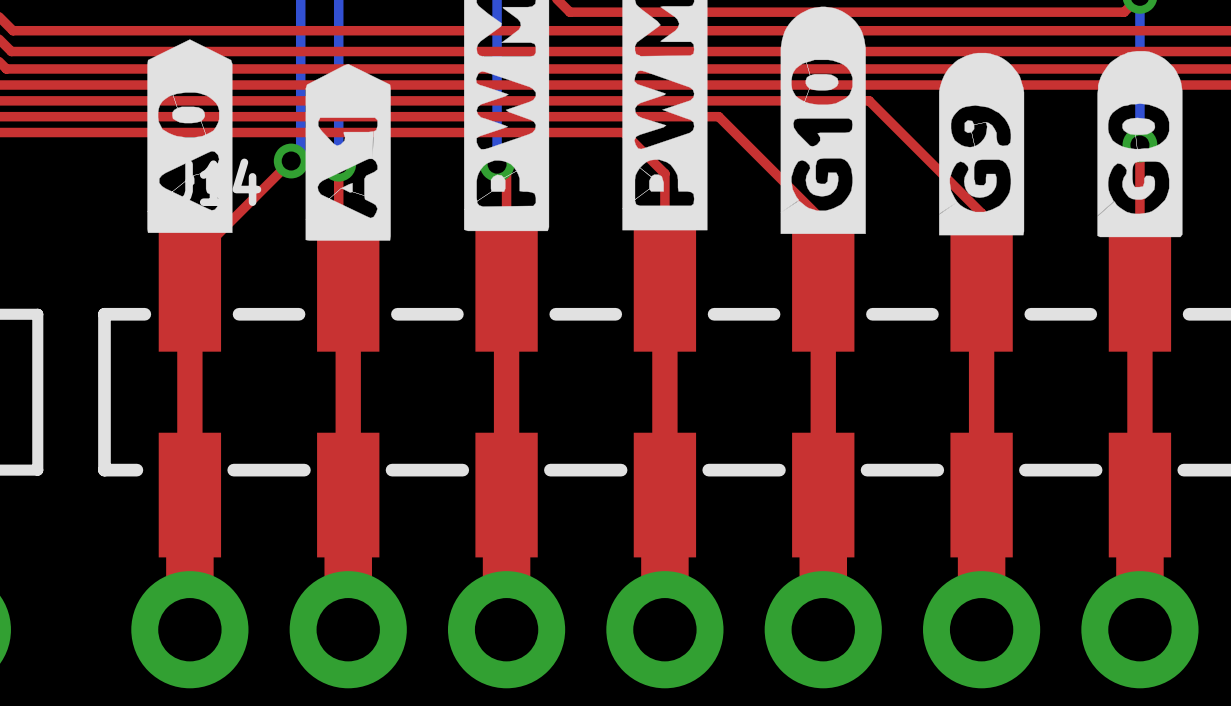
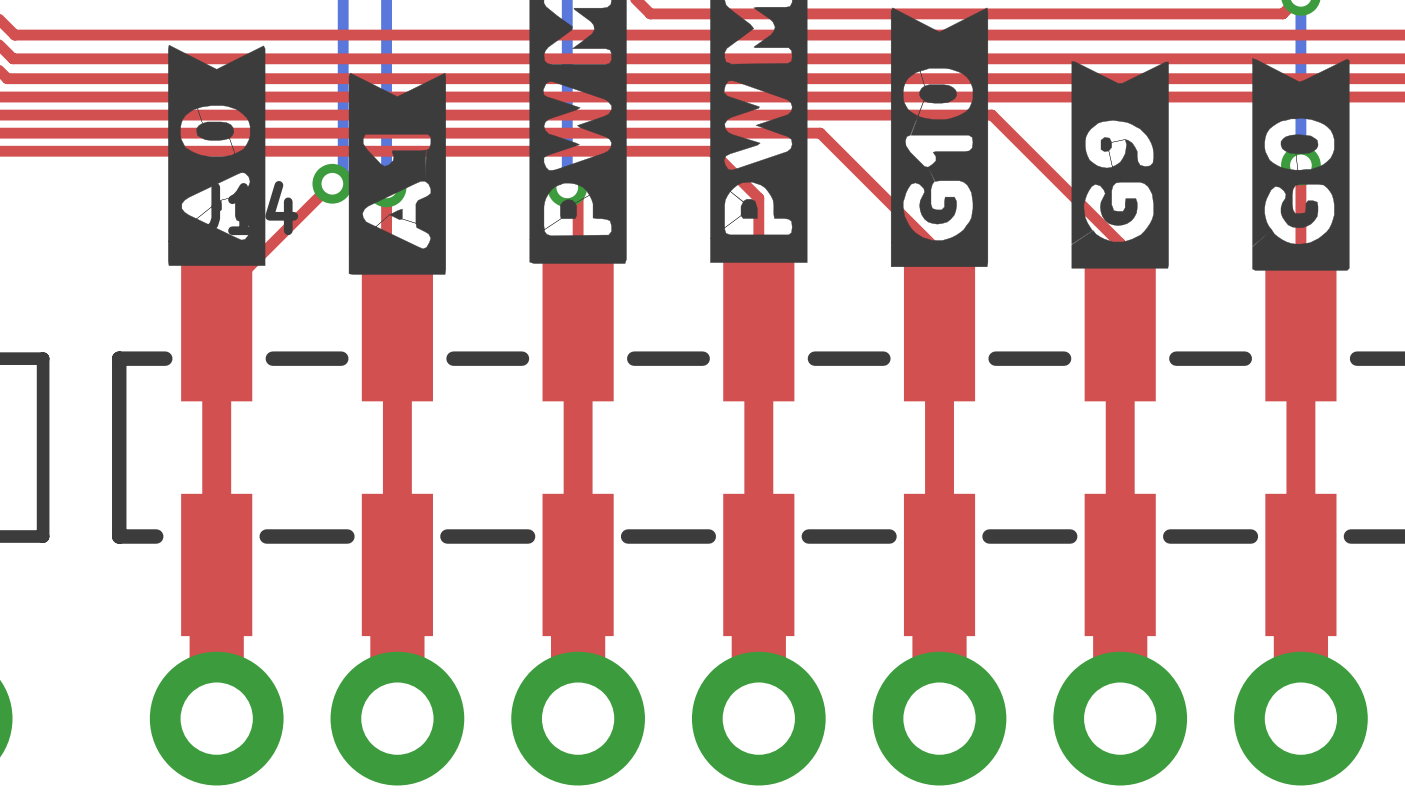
drawing shape: [780, 6, 866, 234] -> [890, 7, 989, 267]
drawing shape: [147, 39, 233, 233] -> [168, 44, 266, 266]
drawing shape: [1097, 51, 1183, 238] -> [1252, 58, 1350, 271]
drawing shape: [939, 52, 1025, 236] -> [1071, 61, 1169, 269]
drawing shape: [305, 63, 391, 241] -> [348, 72, 446, 275]

